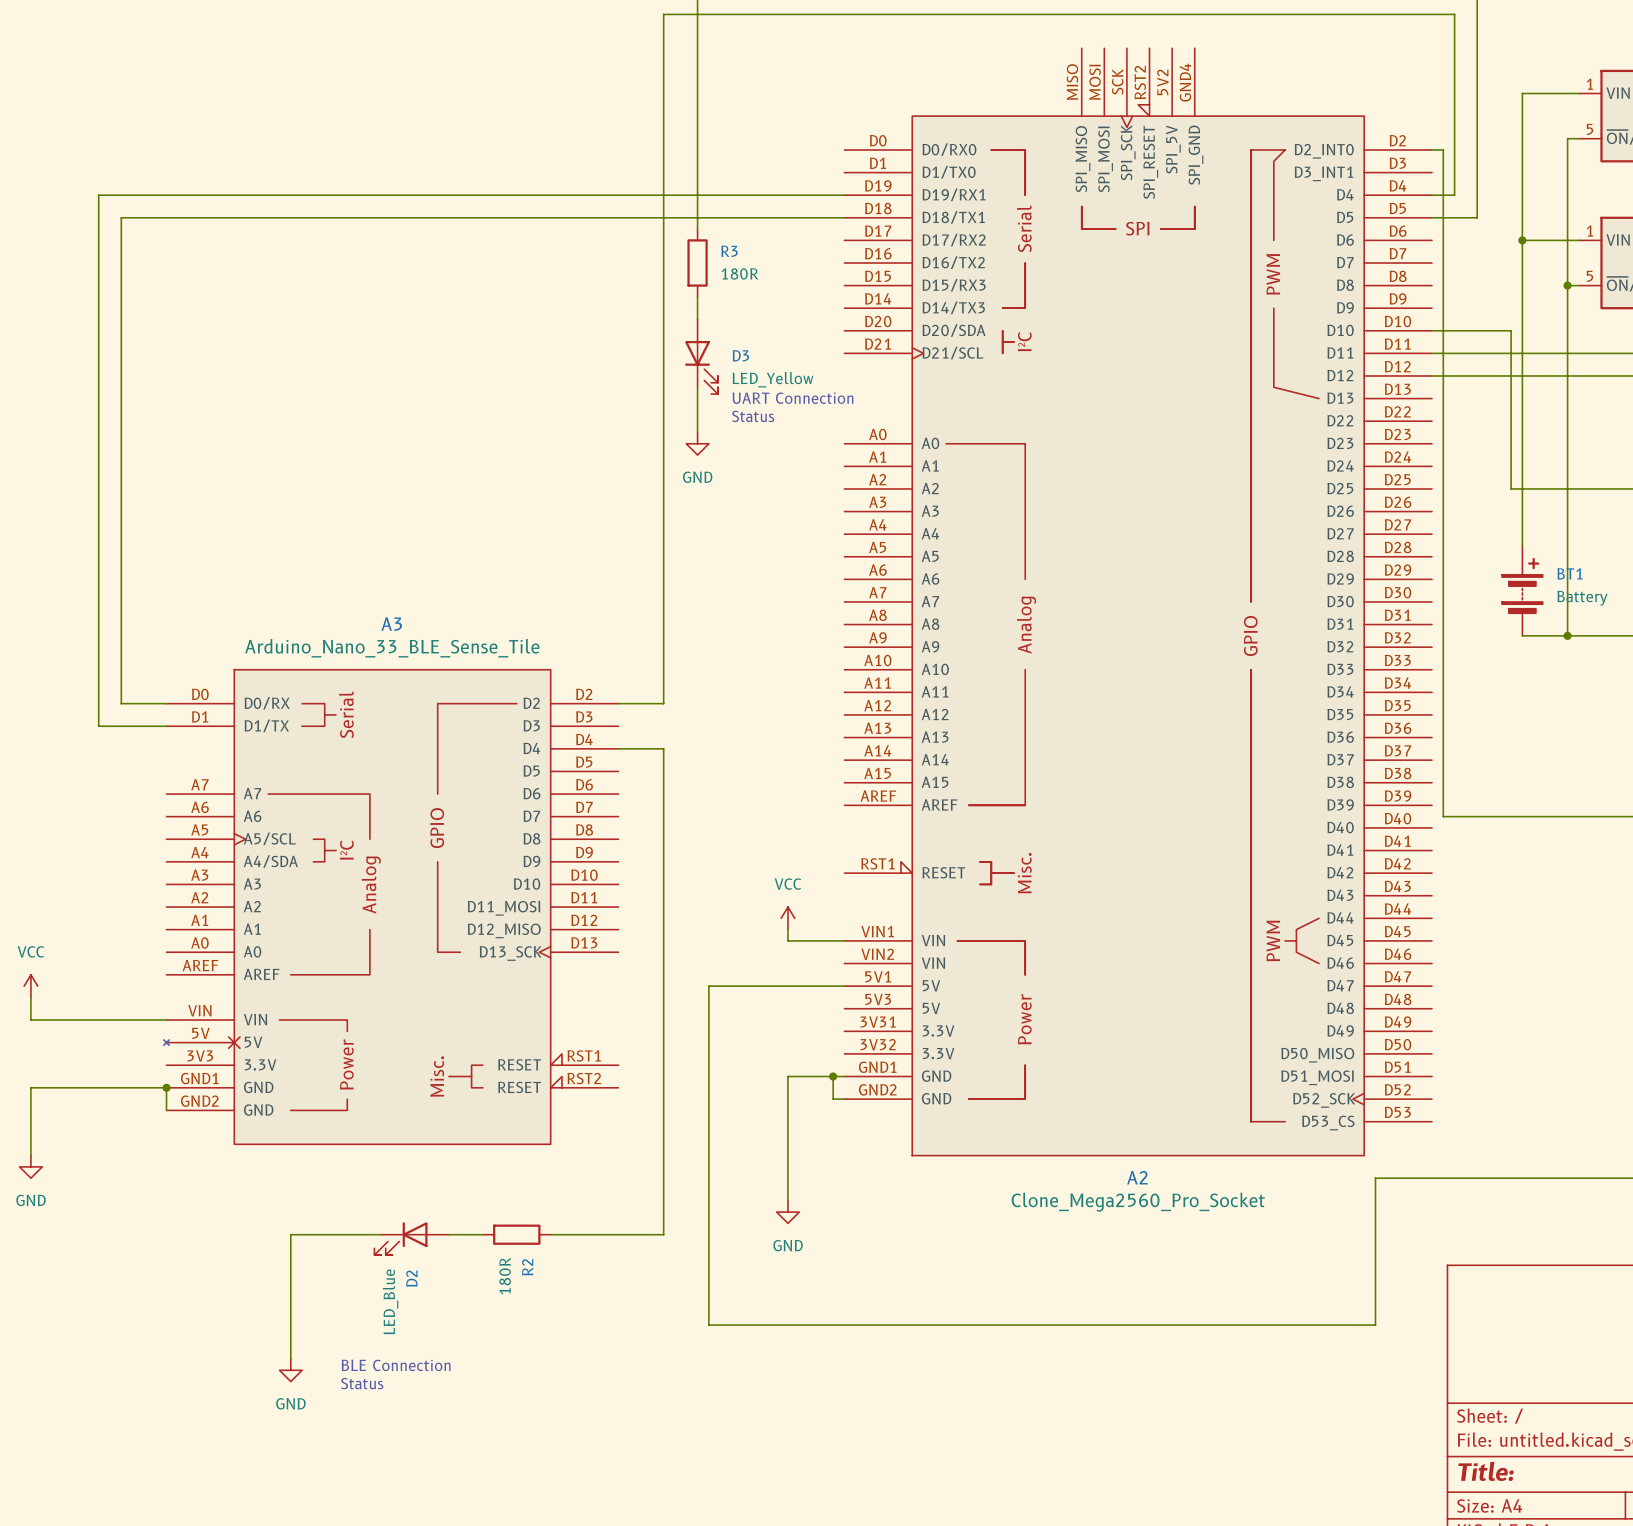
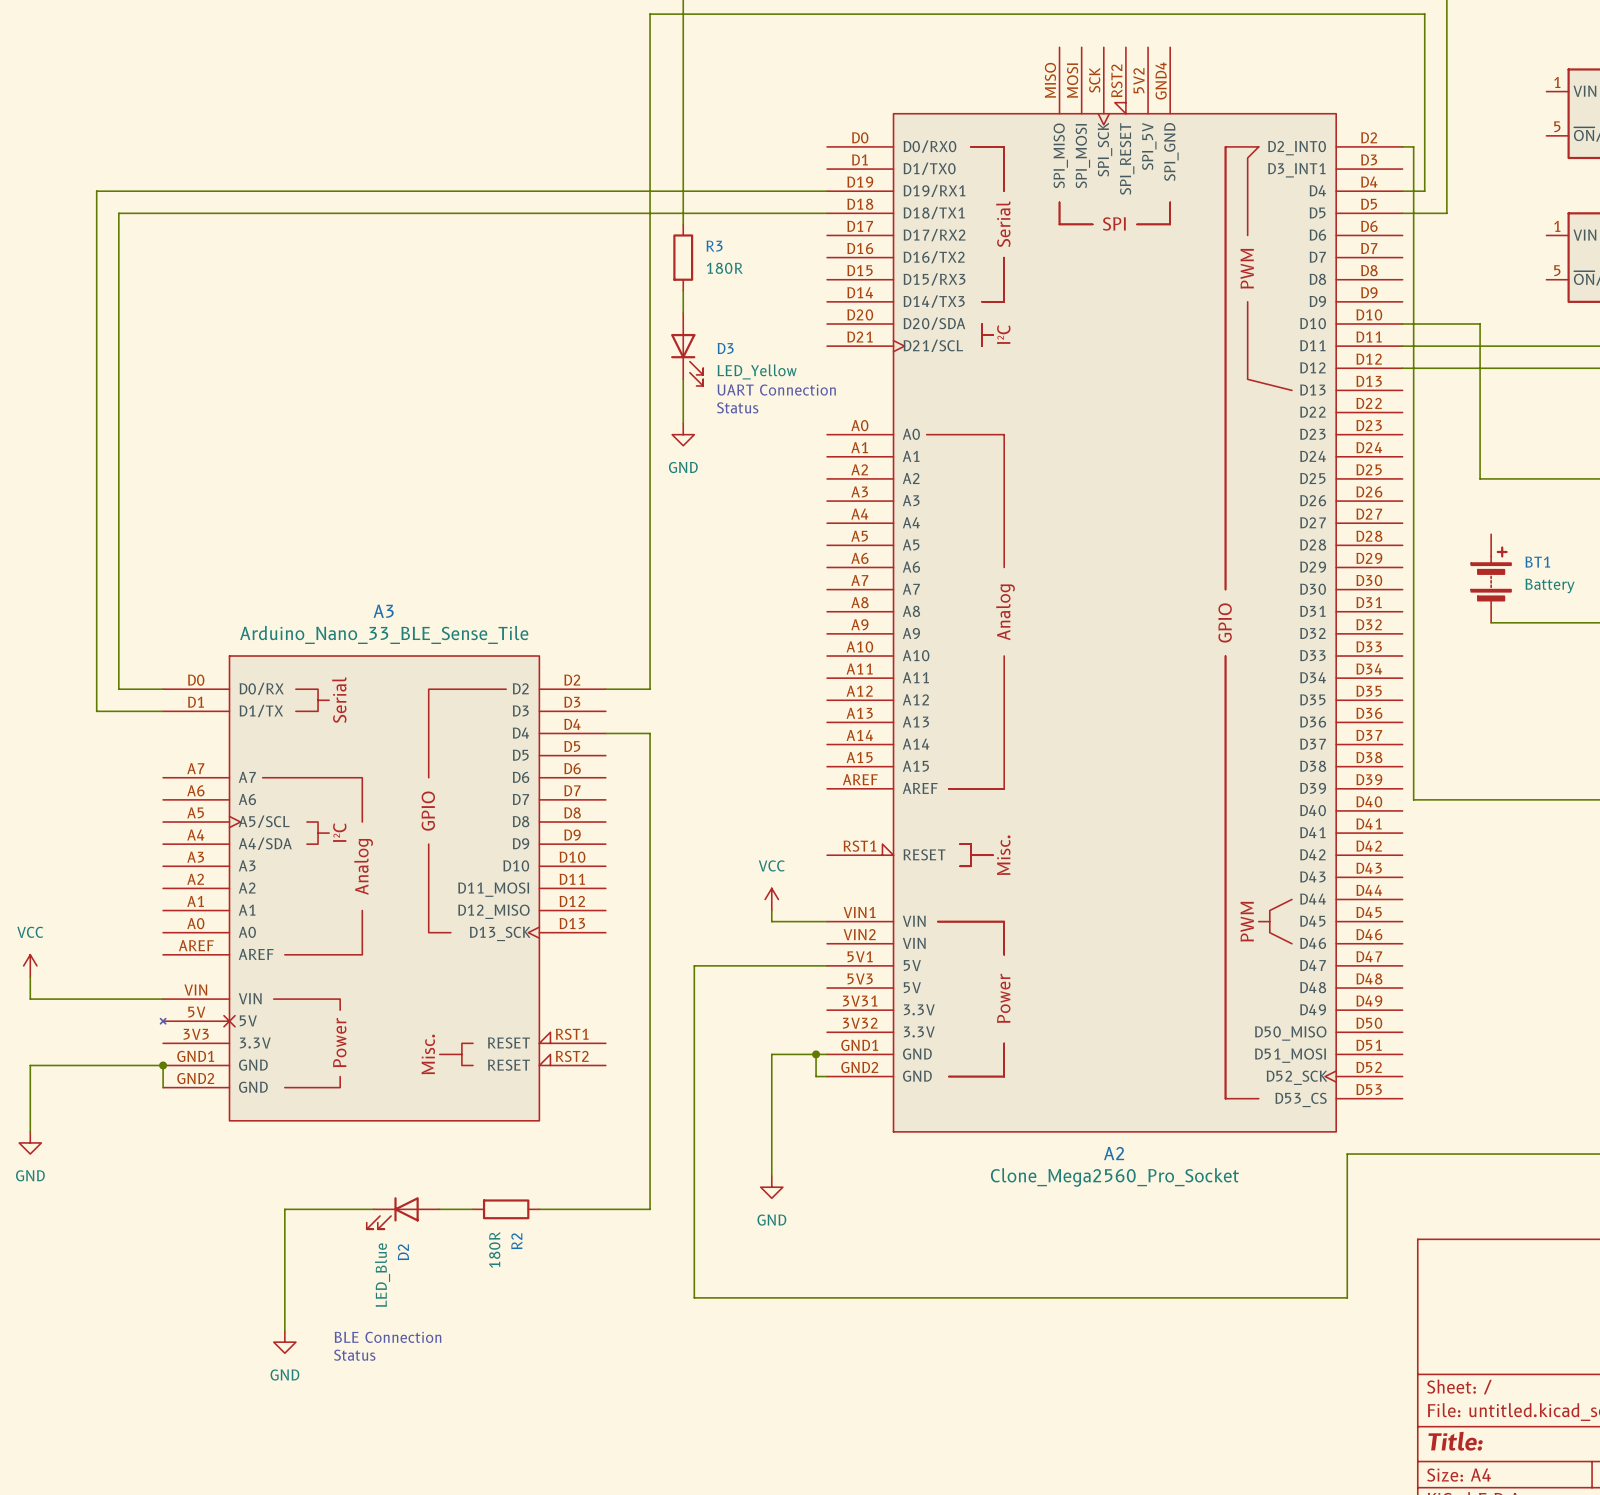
wire: (1578, 93) (1522, 93) (1522, 545) -> none
wire: (1578, 138) (1567, 138) (1567, 635) -> none
wire: (1522, 240) (1578, 240) -> none
junction: (1522, 240) -> none
wire: (1567, 285) (1578, 285) -> none
junction: (1567, 285) -> none
junction: (1567, 635) -> none

